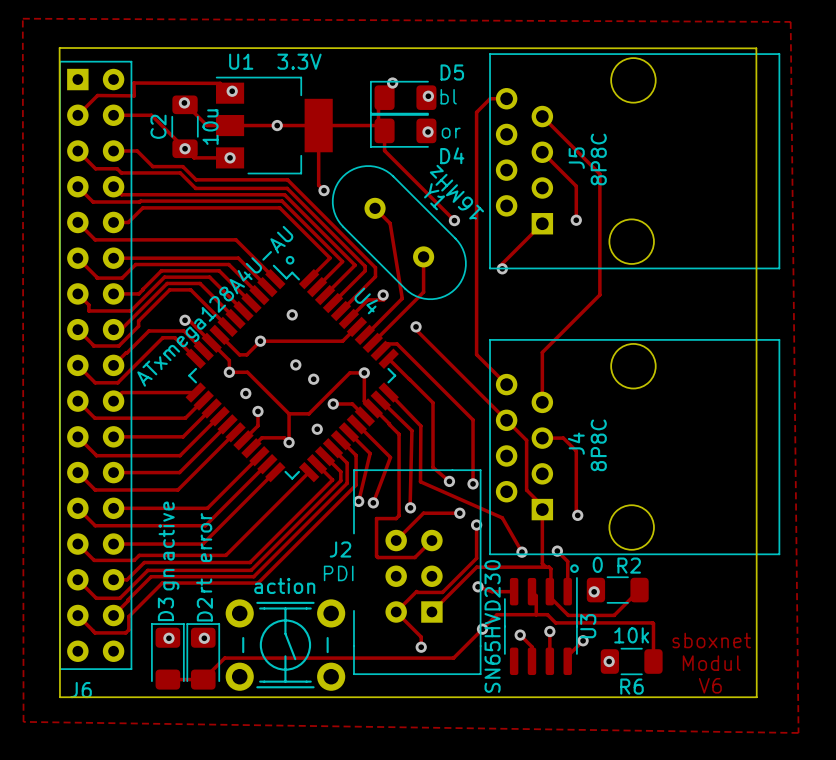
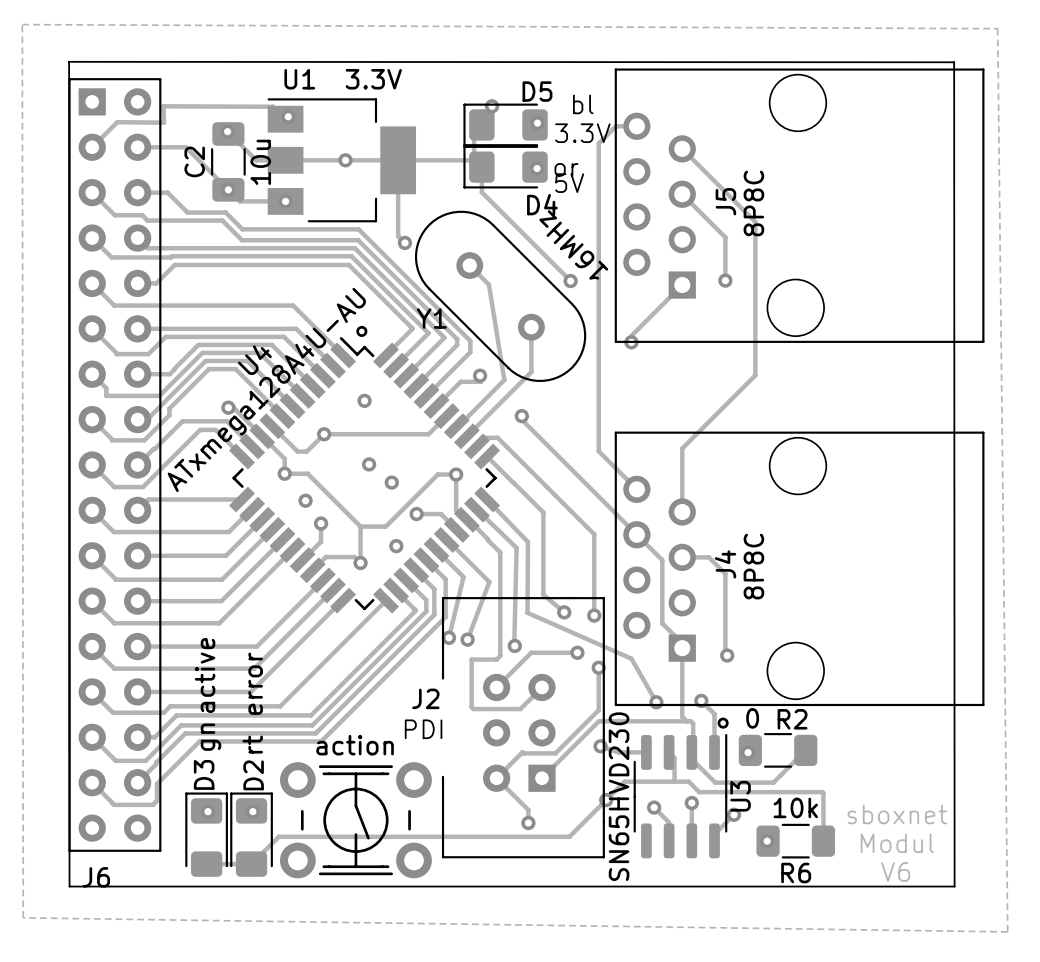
D5 name position: D5 (452, 72) -> D5 (537, 91)
text position: bl (448, 96) -> bl (583, 104)
text: none -> 3.3V (582, 133)
text: none -> 5V (569, 183)
D4 name position: D4 (452, 155) -> D4 (542, 204)
Y1 name rotation: 0° (434, 196) -> 45° counterclockwise (431, 318)
Y1 name position: Y1 (434, 196) -> Y1 (431, 318)
U4 name rotation: 0° (366, 300) -> 90° counterclockwise (254, 360)
U4 name position: U4 (366, 300) -> U4 (254, 360)

